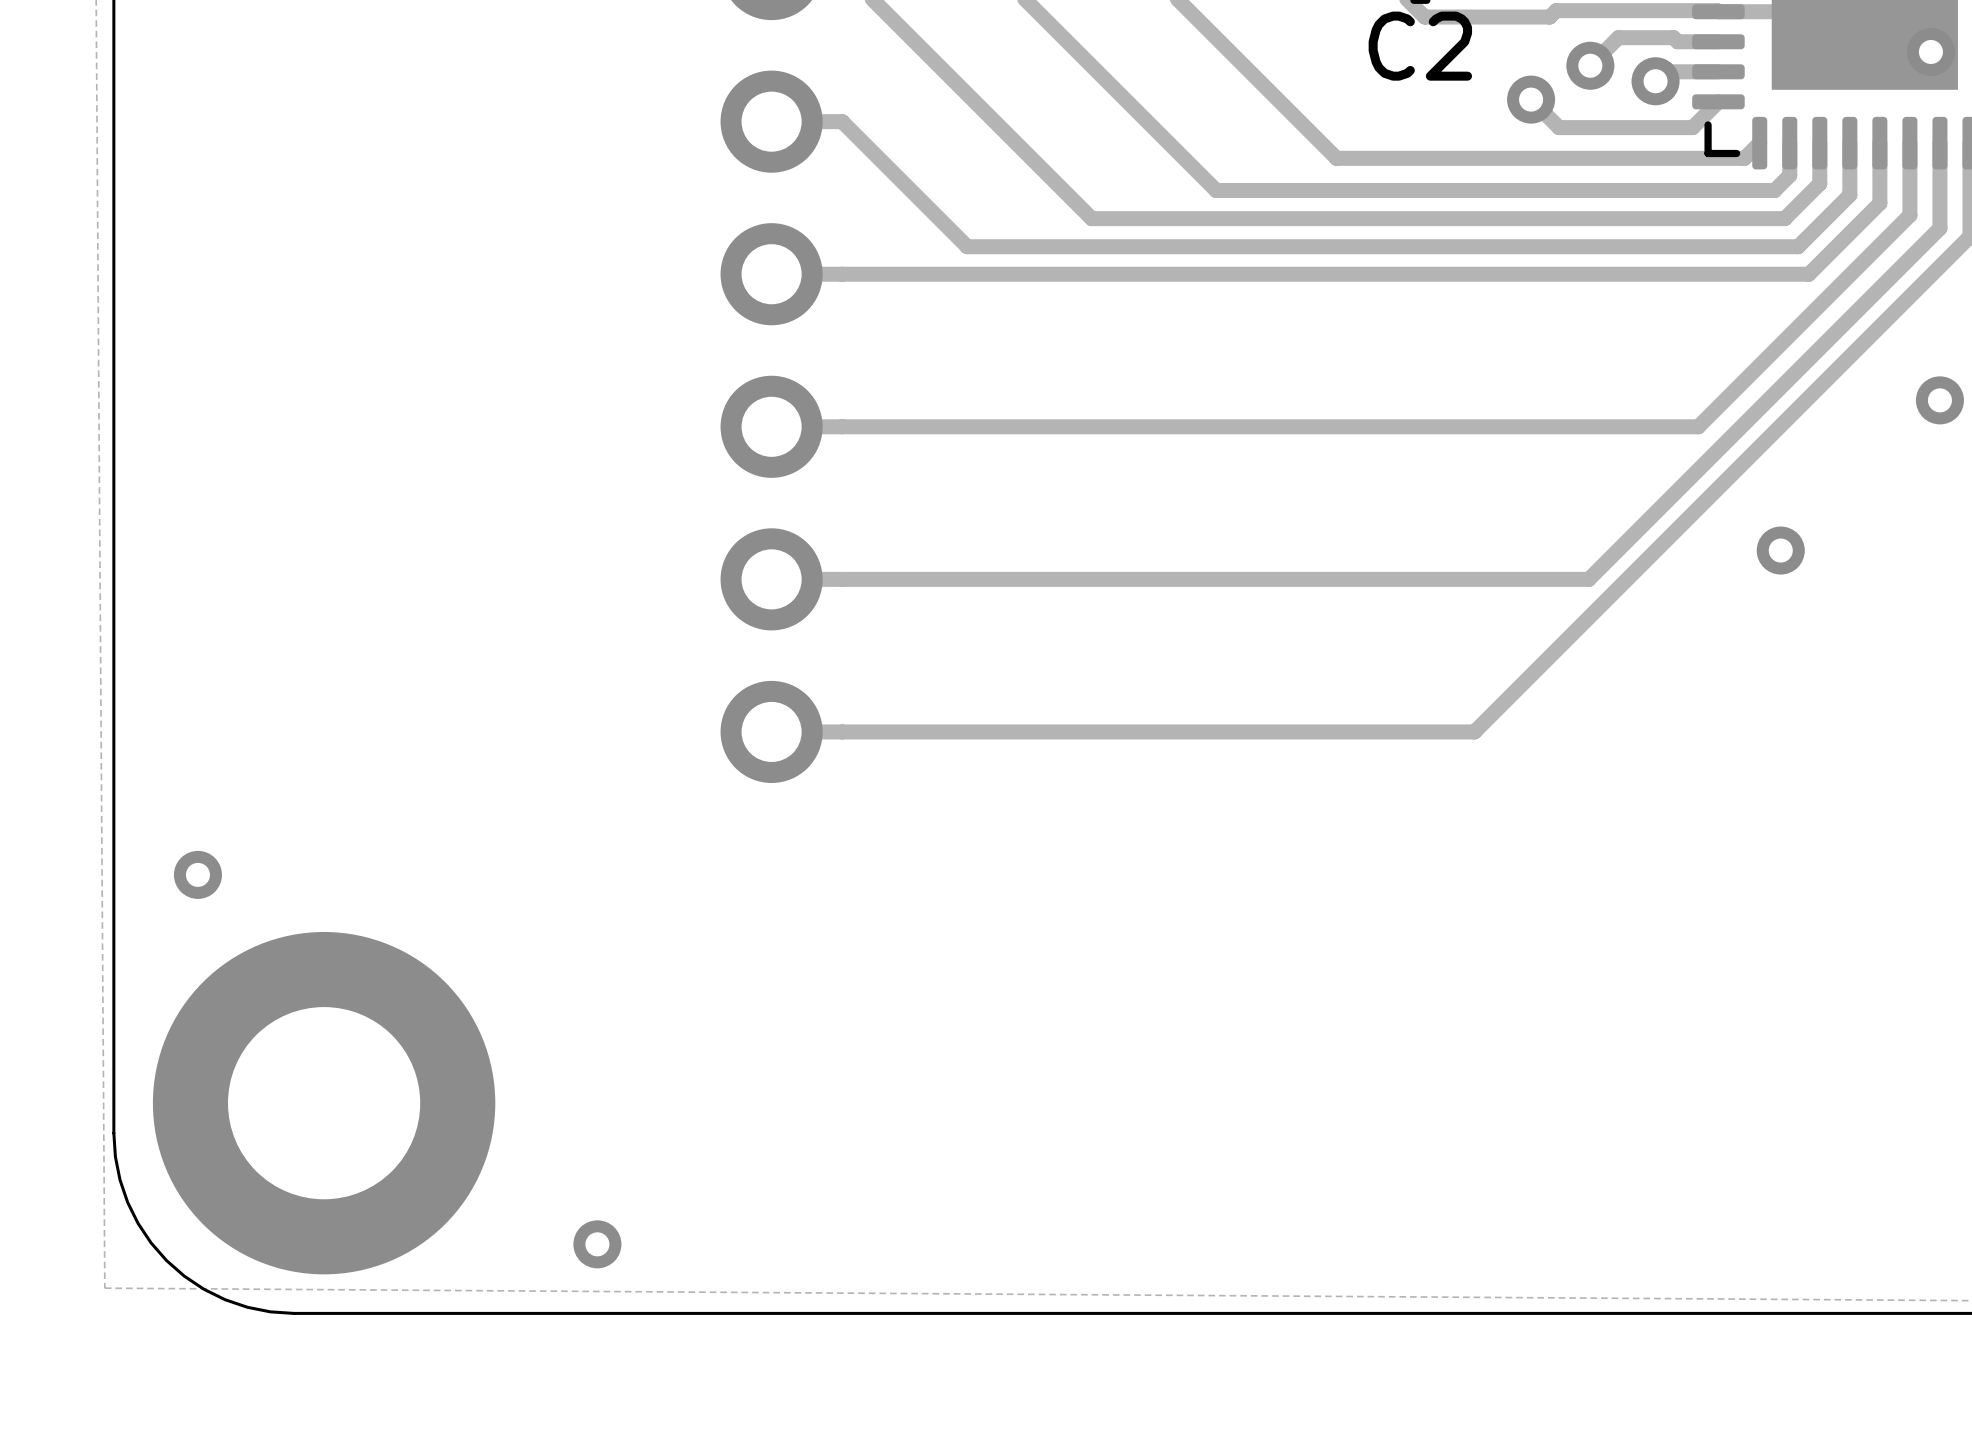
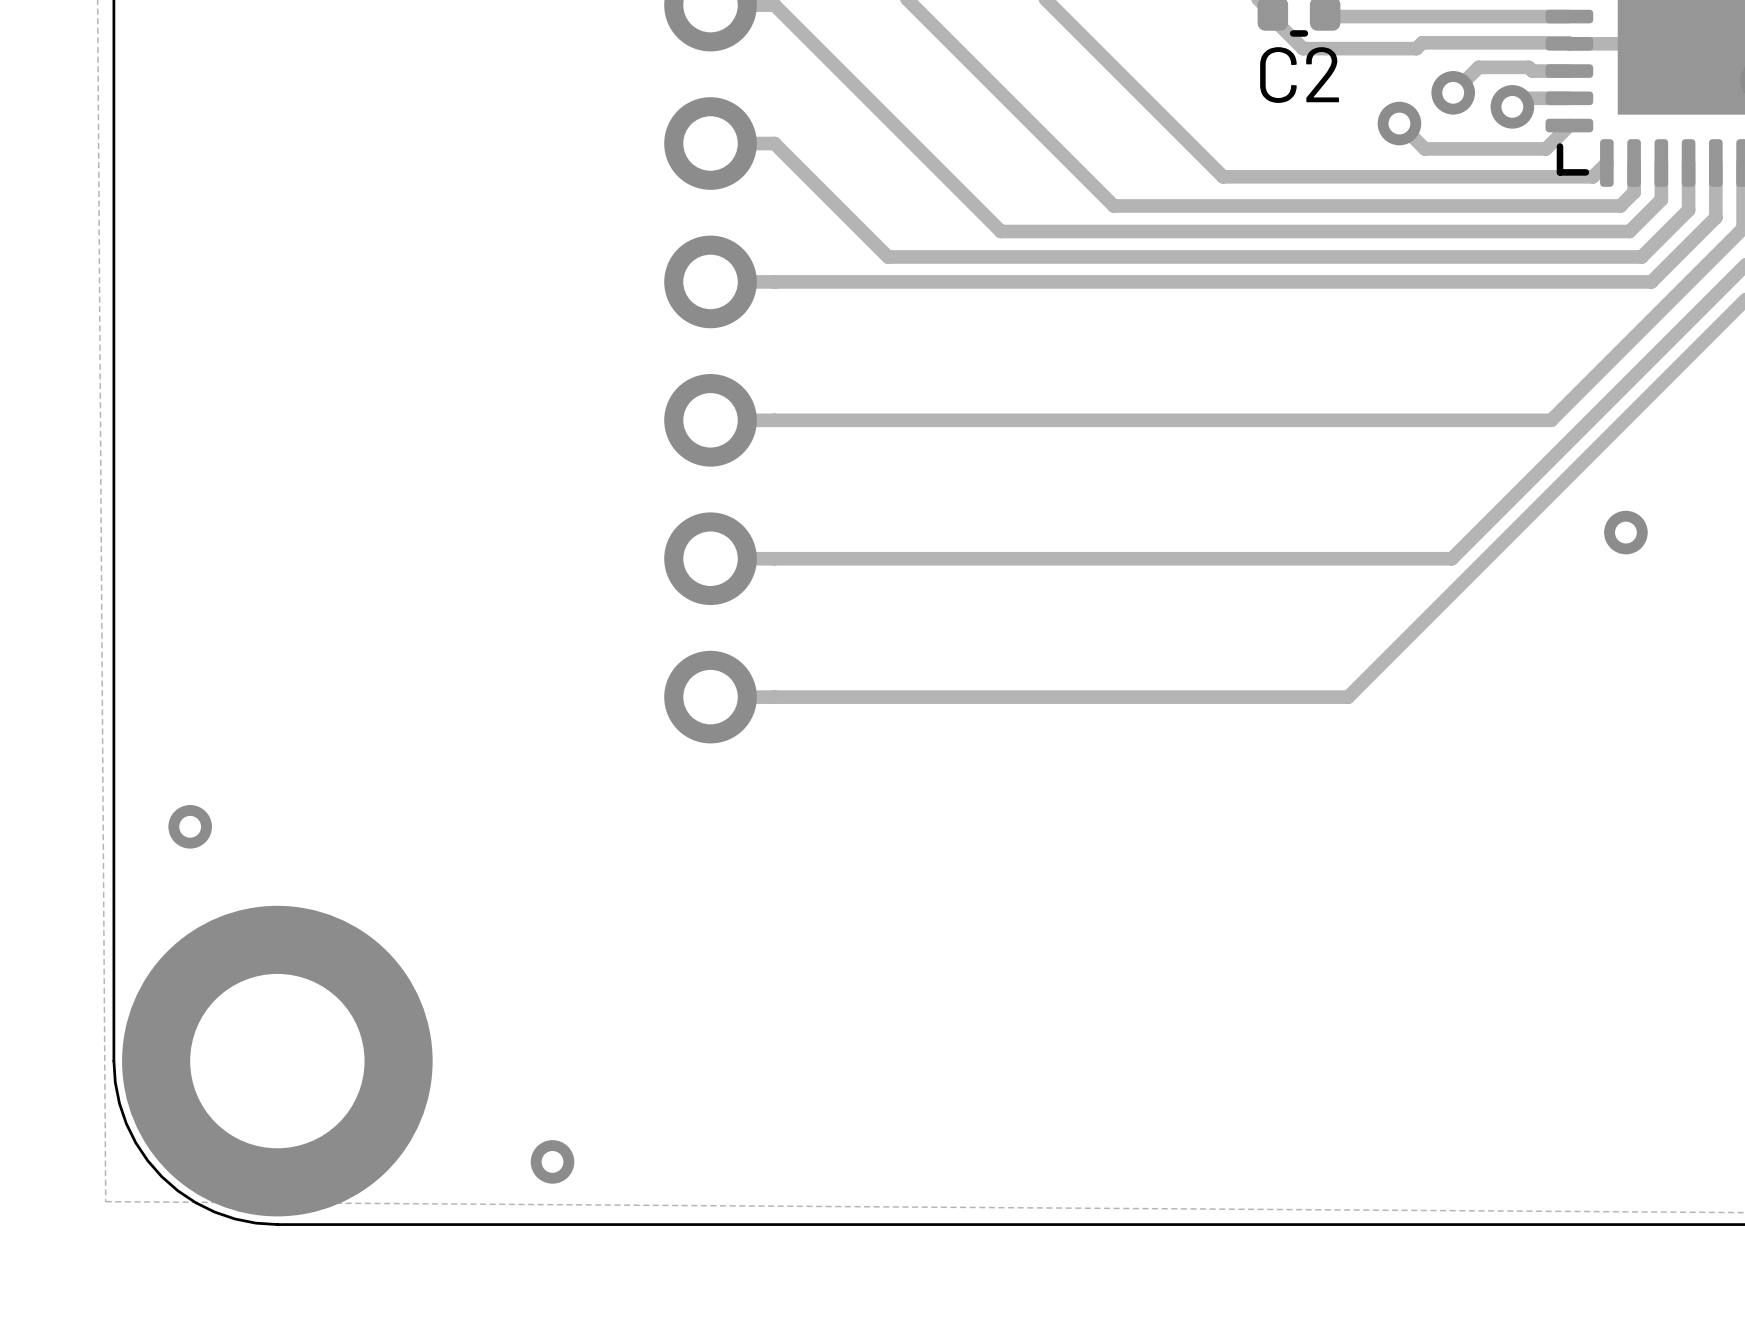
part position: (324, 1103) -> (277, 1061)

